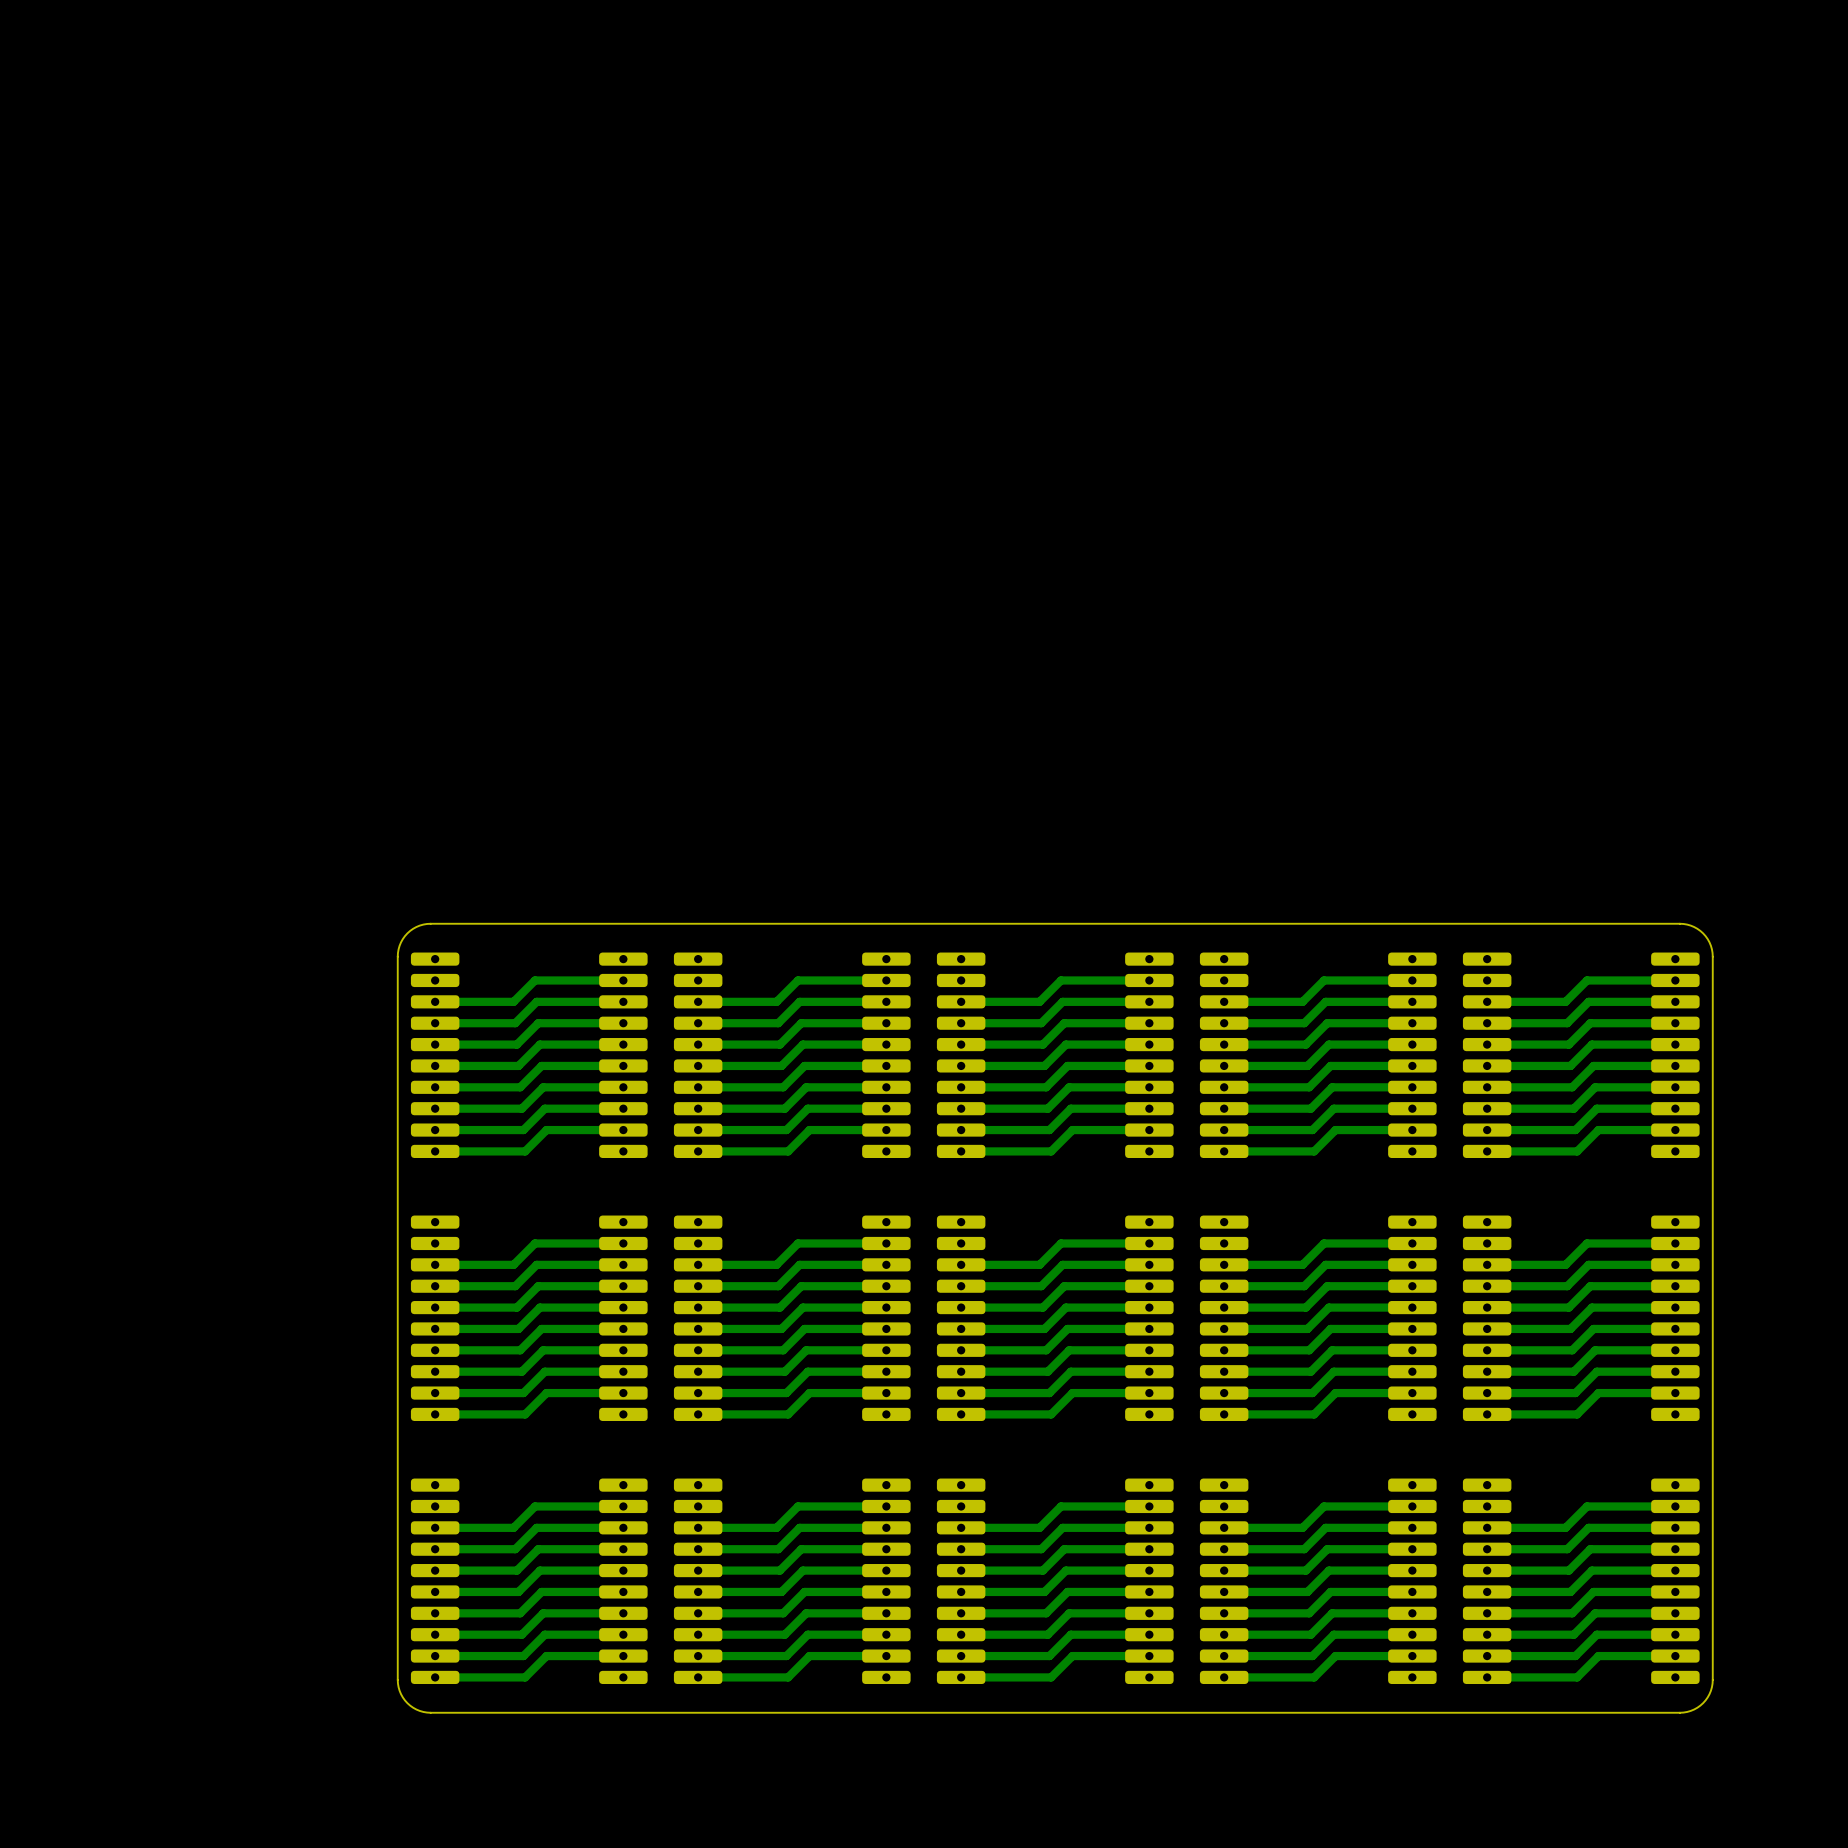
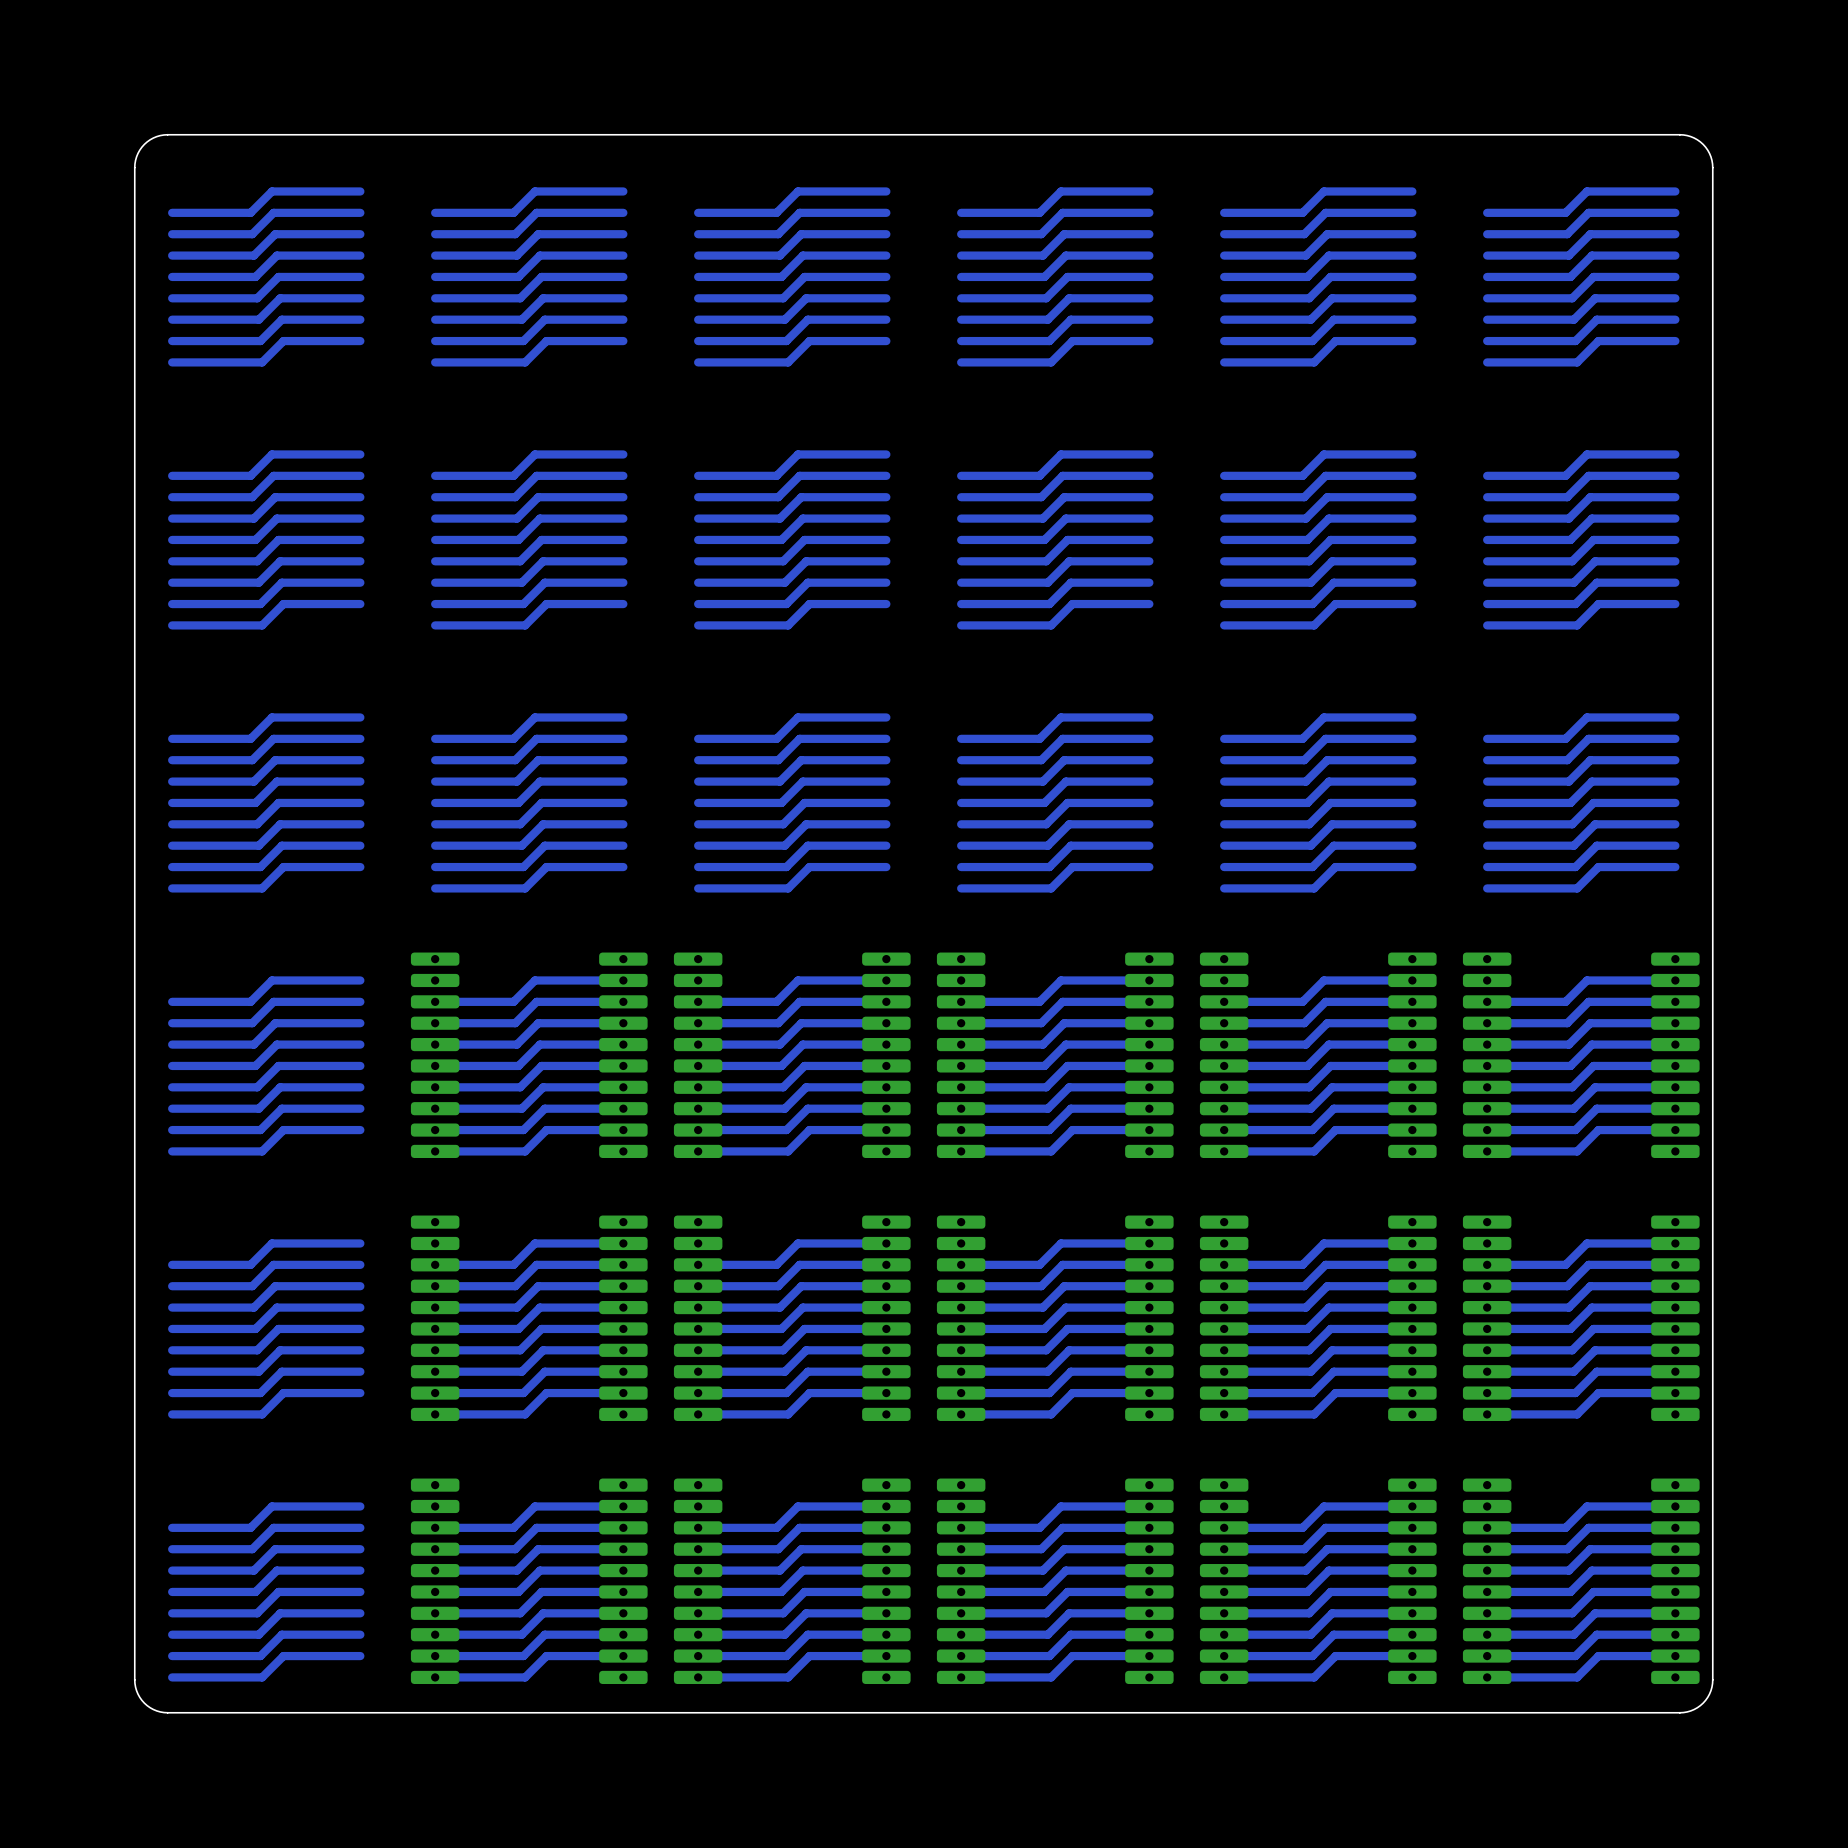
track: none -> (360, 191) (272, 191) (250, 212) (172, 212)
track: none -> (623, 191) (535, 191) (513, 212) (435, 212)
track: none -> (886, 191) (798, 191) (776, 212) (698, 212)
track: none -> (1149, 191) (1061, 191) (1039, 212) (961, 212)
track: none -> (1412, 191) (1324, 191) (1302, 212) (1224, 212)
track: none -> (1675, 191) (1587, 191) (1565, 212) (1487, 212)
track: none -> (360, 212) (273, 212) (252, 234) (172, 234)
track: none -> (623, 212) (536, 212) (515, 234) (435, 234)
track: none -> (886, 212) (799, 212) (778, 234) (698, 234)
track: none -> (1149, 212) (1062, 212) (1041, 234) (961, 234)
track: none -> (1412, 212) (1325, 212) (1304, 234) (1224, 234)
track: none -> (1675, 212) (1588, 212) (1567, 234) (1487, 234)
track: none -> (360, 234) (275, 234) (253, 255) (172, 255)
track: none -> (623, 234) (538, 234) (516, 255) (435, 255)
track: none -> (886, 234) (801, 234) (779, 255) (698, 255)
track: none -> (1149, 234) (1064, 234) (1042, 255) (961, 255)
track: none -> (1412, 234) (1327, 234) (1305, 255) (1224, 255)
track: none -> (1675, 234) (1590, 234) (1568, 255) (1487, 255)
track: none -> (360, 255) (276, 255) (255, 276) (172, 276)
track: none -> (623, 255) (539, 255) (518, 276) (435, 276)
track: none -> (886, 255) (802, 255) (781, 276) (698, 276)
track: none -> (1149, 255) (1065, 255) (1044, 276) (961, 276)
track: none -> (1412, 255) (1328, 255) (1307, 276) (1224, 276)
track: none -> (1675, 255) (1591, 255) (1570, 276) (1487, 276)
track: none -> (360, 276) (278, 276) (257, 298) (172, 298)
track: none -> (623, 276) (541, 276) (520, 298) (435, 298)
track: none -> (886, 276) (804, 276) (783, 298) (698, 298)
track: none -> (1149, 276) (1067, 276) (1046, 298) (961, 298)
track: none -> (1412, 276) (1330, 276) (1309, 298) (1224, 298)
track: none -> (1675, 276) (1593, 276) (1572, 298) (1487, 298)
track: none -> (360, 298) (280, 298) (258, 319) (172, 319)
track: none -> (623, 298) (543, 298) (521, 319) (435, 319)
track: none -> (886, 298) (806, 298) (784, 319) (698, 319)
track: none -> (1149, 298) (1069, 298) (1047, 319) (961, 319)
track: none -> (1412, 298) (1332, 298) (1310, 319) (1224, 319)
track: none -> (1675, 298) (1595, 298) (1573, 319) (1487, 319)
track: none -> (360, 319) (281, 319) (260, 341) (172, 341)
track: none -> (623, 319) (544, 319) (523, 341) (435, 341)
track: none -> (886, 319) (807, 319) (786, 341) (698, 341)
track: none -> (1149, 319) (1070, 319) (1049, 341) (961, 341)
track: none -> (1412, 319) (1333, 319) (1312, 341) (1224, 341)
track: none -> (1675, 319) (1596, 319) (1575, 341) (1487, 341)
track: none -> (360, 341) (283, 341) (262, 362) (172, 362)
track: none -> (623, 341) (546, 341) (525, 362) (435, 362)
track: none -> (886, 341) (809, 341) (788, 362) (698, 362)
track: none -> (1149, 341) (1072, 341) (1051, 362) (961, 362)
track: none -> (1412, 341) (1335, 341) (1314, 362) (1224, 362)
track: none -> (1675, 341) (1598, 341) (1577, 362) (1487, 362)
track: none -> (360, 454) (272, 454) (250, 475) (172, 475)
track: none -> (623, 454) (535, 454) (513, 475) (435, 475)
track: none -> (886, 454) (798, 454) (776, 475) (698, 475)
track: none -> (1149, 454) (1061, 454) (1039, 475) (961, 475)
track: none -> (1412, 454) (1324, 454) (1302, 475) (1224, 475)
track: none -> (1675, 454) (1587, 454) (1565, 475) (1487, 475)
track: none -> (360, 475) (273, 475) (252, 497) (172, 497)
track: none -> (623, 475) (536, 475) (515, 497) (435, 497)
track: none -> (886, 475) (799, 475) (778, 497) (698, 497)
track: none -> (1149, 475) (1062, 475) (1041, 497) (961, 497)
track: none -> (1412, 475) (1325, 475) (1304, 497) (1224, 497)
track: none -> (1675, 475) (1588, 475) (1567, 497) (1487, 497)
track: none -> (360, 497) (275, 497) (253, 518) (172, 518)
track: none -> (623, 497) (538, 497) (516, 518) (435, 518)
track: none -> (886, 497) (801, 497) (779, 518) (698, 518)
track: none -> (1149, 497) (1064, 497) (1042, 518) (961, 518)
track: none -> (1412, 497) (1327, 497) (1305, 518) (1224, 518)
track: none -> (1675, 497) (1590, 497) (1568, 518) (1487, 518)
track: none -> (360, 518) (276, 518) (255, 539) (172, 539)
track: none -> (623, 518) (539, 518) (518, 539) (435, 539)
track: none -> (886, 518) (802, 518) (781, 539) (698, 539)
track: none -> (1149, 518) (1065, 518) (1044, 539) (961, 539)
track: none -> (1412, 518) (1328, 518) (1307, 539) (1224, 539)
track: none -> (1675, 518) (1591, 518) (1570, 539) (1487, 539)
track: none -> (360, 539) (278, 539) (257, 561) (172, 561)
track: none -> (623, 539) (541, 539) (520, 561) (435, 561)
track: none -> (886, 539) (804, 539) (783, 561) (698, 561)
track: none -> (1149, 539) (1067, 539) (1046, 561) (961, 561)
track: none -> (1412, 539) (1330, 539) (1309, 561) (1224, 561)
track: none -> (1675, 539) (1593, 539) (1572, 561) (1487, 561)
track: none -> (360, 561) (280, 561) (258, 582) (172, 582)
track: none -> (623, 561) (543, 561) (521, 582) (435, 582)
track: none -> (886, 561) (806, 561) (784, 582) (698, 582)
track: none -> (1149, 561) (1069, 561) (1047, 582) (961, 582)
track: none -> (1412, 561) (1332, 561) (1310, 582) (1224, 582)
track: none -> (1675, 561) (1595, 561) (1573, 582) (1487, 582)
track: none -> (360, 582) (281, 582) (260, 604) (172, 604)
track: none -> (623, 582) (544, 582) (523, 604) (435, 604)
track: none -> (886, 582) (807, 582) (786, 604) (698, 604)
track: none -> (1149, 582) (1070, 582) (1049, 604) (961, 604)
track: none -> (1412, 582) (1333, 582) (1312, 604) (1224, 604)
track: none -> (1675, 582) (1596, 582) (1575, 604) (1487, 604)
track: none -> (360, 604) (283, 604) (262, 625) (172, 625)
track: none -> (623, 604) (546, 604) (525, 625) (435, 625)
track: none -> (886, 604) (809, 604) (788, 625) (698, 625)
track: none -> (1149, 604) (1072, 604) (1051, 625) (961, 625)
track: none -> (1412, 604) (1335, 604) (1314, 625) (1224, 625)
track: none -> (1675, 604) (1598, 604) (1577, 625) (1487, 625)
track: none -> (360, 717) (272, 717) (250, 738) (172, 738)
track: none -> (623, 717) (535, 717) (513, 738) (435, 738)
track: none -> (886, 717) (798, 717) (776, 738) (698, 738)
track: none -> (1149, 717) (1061, 717) (1039, 738) (961, 738)
track: none -> (1412, 717) (1324, 717) (1302, 738) (1224, 738)
track: none -> (1675, 717) (1587, 717) (1565, 738) (1487, 738)
track: none -> (360, 738) (273, 738) (252, 760) (172, 760)
track: none -> (623, 738) (536, 738) (515, 760) (435, 760)
track: none -> (886, 738) (799, 738) (778, 760) (698, 760)
track: none -> (1149, 738) (1062, 738) (1041, 760) (961, 760)
track: none -> (1412, 738) (1325, 738) (1304, 760) (1224, 760)
track: none -> (1675, 738) (1588, 738) (1567, 760) (1487, 760)
track: none -> (360, 760) (275, 760) (253, 781) (172, 781)
track: none -> (623, 760) (538, 760) (516, 781) (435, 781)
track: none -> (886, 760) (801, 760) (779, 781) (698, 781)
track: none -> (1149, 760) (1064, 760) (1042, 781) (961, 781)
track: none -> (1412, 760) (1327, 760) (1305, 781) (1224, 781)
track: none -> (1675, 760) (1590, 760) (1568, 781) (1487, 781)
track: none -> (360, 781) (276, 781) (255, 802) (172, 802)
track: none -> (623, 781) (539, 781) (518, 802) (435, 802)
track: none -> (886, 781) (802, 781) (781, 802) (698, 802)
track: none -> (1149, 781) (1065, 781) (1044, 802) (961, 802)
track: none -> (1412, 781) (1328, 781) (1307, 802) (1224, 802)
track: none -> (1675, 781) (1591, 781) (1570, 802) (1487, 802)
track: none -> (360, 802) (278, 802) (257, 824) (172, 824)
track: none -> (623, 802) (541, 802) (520, 824) (435, 824)
track: none -> (886, 802) (804, 802) (783, 824) (698, 824)
track: none -> (1149, 802) (1067, 802) (1046, 824) (961, 824)
track: none -> (1412, 802) (1330, 802) (1309, 824) (1224, 824)
track: none -> (1675, 802) (1593, 802) (1572, 824) (1487, 824)
track: none -> (360, 824) (280, 824) (258, 845) (172, 845)
track: none -> (623, 824) (543, 824) (521, 845) (435, 845)
track: none -> (886, 824) (806, 824) (784, 845) (698, 845)
track: none -> (1149, 824) (1069, 824) (1047, 845) (961, 845)
track: none -> (1412, 824) (1332, 824) (1310, 845) (1224, 845)
track: none -> (1675, 824) (1595, 824) (1573, 845) (1487, 845)
track: none -> (360, 845) (281, 845) (260, 867) (172, 867)
track: none -> (623, 845) (544, 845) (523, 867) (435, 867)
track: none -> (886, 845) (807, 845) (786, 867) (698, 867)
track: none -> (1149, 845) (1070, 845) (1049, 867) (961, 867)
track: none -> (1412, 845) (1333, 845) (1312, 867) (1224, 867)
track: none -> (1675, 845) (1596, 845) (1575, 867) (1487, 867)
track: none -> (360, 867) (283, 867) (262, 888) (172, 888)
track: none -> (623, 867) (546, 867) (525, 888) (435, 888)
track: none -> (886, 867) (809, 867) (788, 888) (698, 888)
track: none -> (1149, 867) (1072, 867) (1051, 888) (961, 888)
track: none -> (1412, 867) (1335, 867) (1314, 888) (1224, 888)
track: none -> (1675, 867) (1598, 867) (1577, 888) (1487, 888)
board edge: (1712, 956) (1709, 942) (1703, 933) (1694, 927) (1679, 923) (430, 923) (413, 928) (401, 942) (397, 956) (397, 1679) (401, 1694) (407, 1703) (416, 1709) (430, 1712) -> (1712, 956) (1712, 167) (1707, 150) (1694, 138) (1679, 134) (167, 134) (150, 139) (139, 150) (134, 167) (135, 1687) (144, 1703) (153, 1709) (163, 1712) (430, 1712)
track: none -> (360, 980) (272, 980) (250, 1001) (172, 1001)
track: none -> (360, 1001) (273, 1001) (252, 1023) (172, 1023)
track: none -> (360, 1023) (275, 1023) (253, 1044) (172, 1044)
track: none -> (360, 1044) (276, 1044) (255, 1065) (172, 1065)
track: none -> (360, 1065) (278, 1065) (257, 1087) (172, 1087)
track: none -> (360, 1087) (280, 1087) (258, 1108) (172, 1108)
track: none -> (360, 1108) (281, 1108) (260, 1130) (172, 1130)
track: none -> (360, 1130) (283, 1130) (262, 1151) (172, 1151)
track: none -> (360, 1243) (272, 1243) (250, 1264) (172, 1264)
track: none -> (360, 1264) (273, 1264) (252, 1286) (172, 1286)
track: none -> (360, 1286) (275, 1286) (253, 1307) (172, 1307)
track: none -> (360, 1307) (276, 1307) (255, 1328) (172, 1328)
track: none -> (360, 1328) (278, 1328) (257, 1350) (172, 1350)
track: none -> (360, 1350) (280, 1350) (258, 1371) (172, 1371)
track: none -> (360, 1371) (281, 1371) (260, 1393) (172, 1393)
track: none -> (360, 1393) (283, 1393) (262, 1414) (172, 1414)
track: none -> (360, 1506) (272, 1506) (250, 1527) (172, 1527)
track: none -> (360, 1527) (273, 1527) (252, 1549) (172, 1549)
track: none -> (360, 1549) (275, 1549) (253, 1570) (172, 1570)
track: none -> (360, 1570) (276, 1570) (255, 1591) (172, 1591)
track: none -> (360, 1591) (278, 1591) (257, 1613) (172, 1613)
track: none -> (360, 1613) (280, 1613) (258, 1634) (172, 1634)
track: none -> (360, 1634) (281, 1634) (260, 1656) (172, 1656)
track: none -> (360, 1656) (283, 1656) (262, 1677) (172, 1677)

